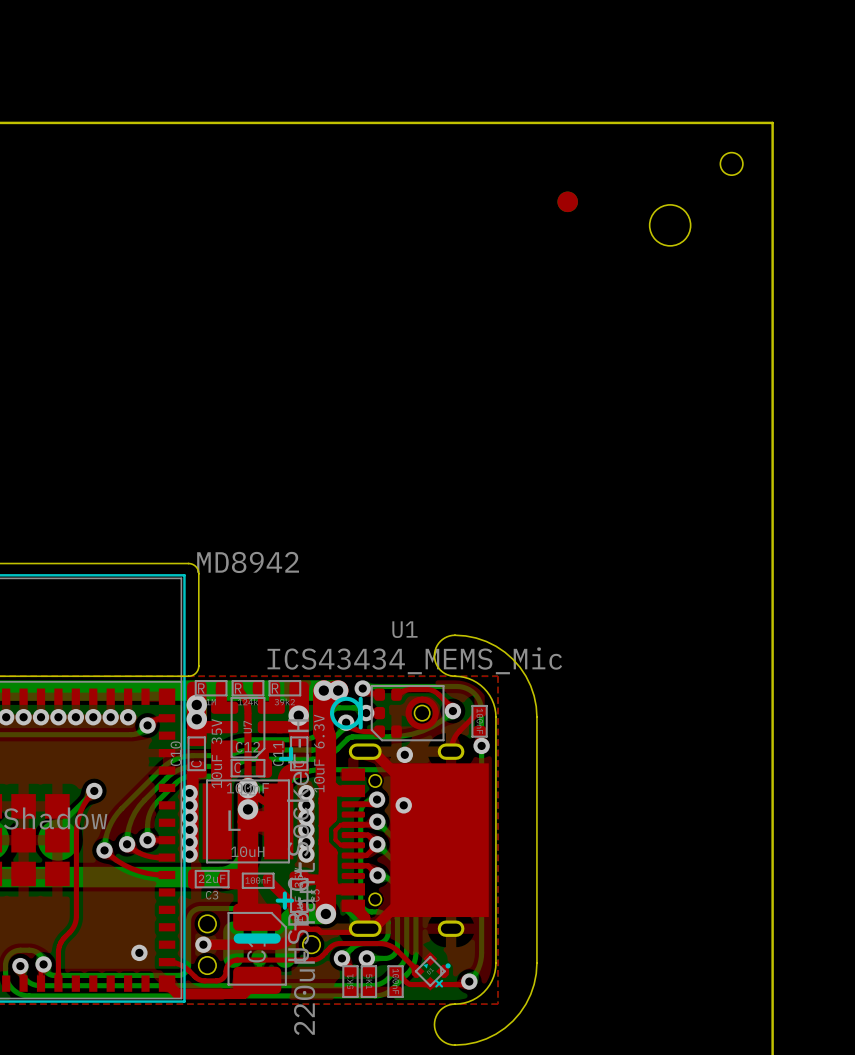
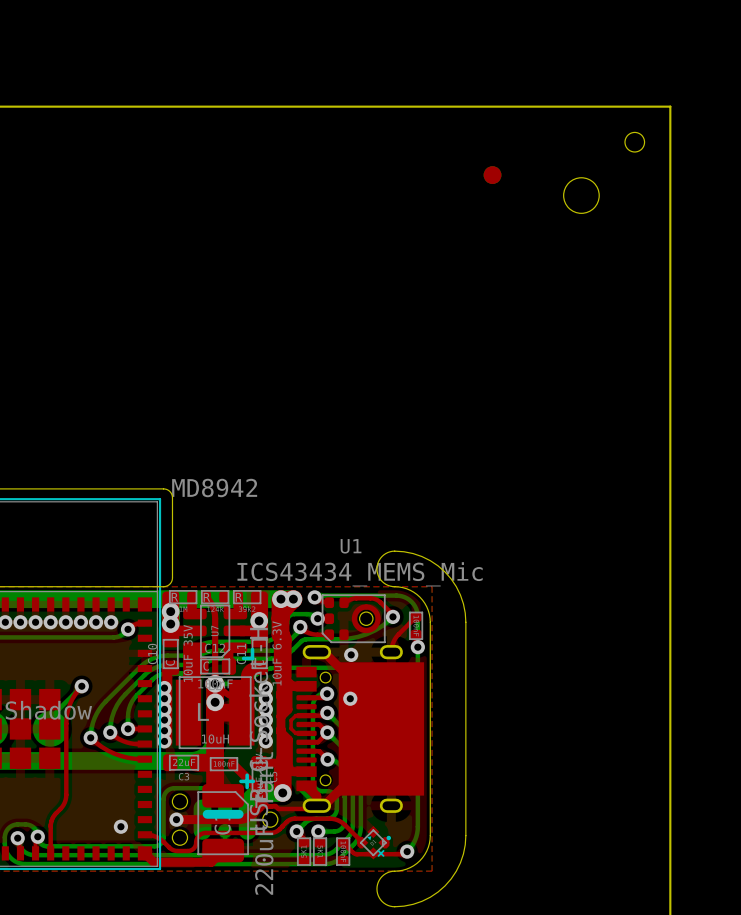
drawing: [329, 696, 363, 730] -> none
line: (360, 698) (360, 727) -> none

